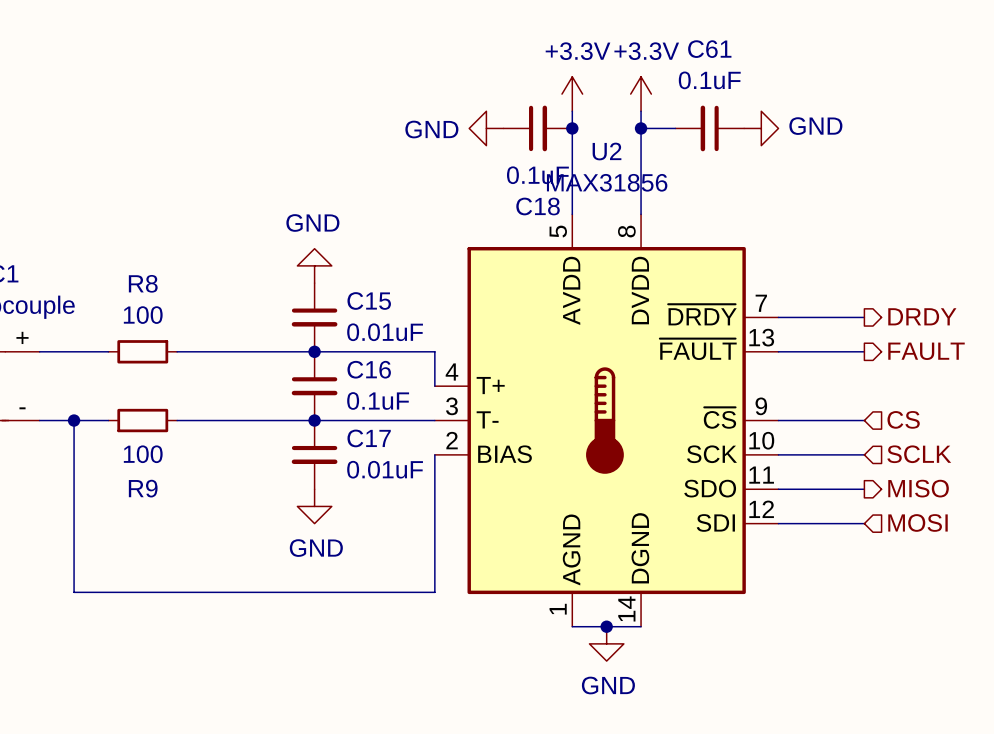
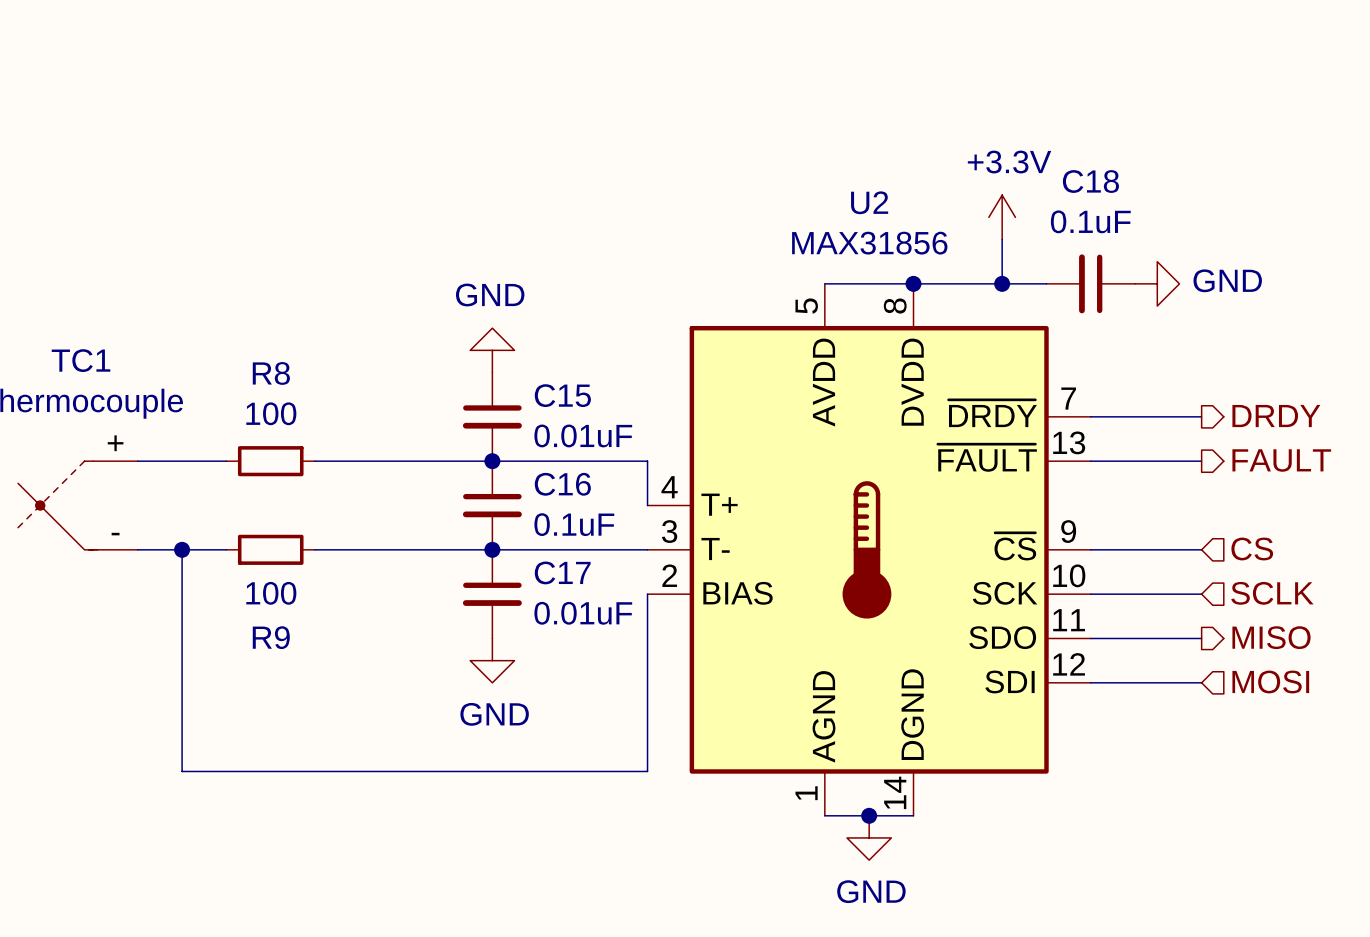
power symbol: +3.3V (572, 94) -> none
power symbol: +3.3V (641, 94) -> none
wire: (572, 111) (572, 214) -> (1046, 283) (824, 283)
wire: (641, 111) (641, 214) -> none
power symbol: GND (486, 128) -> none
C18 position: (537, 128) -> (1090, 283)
C18 rotation: 0° (538, 128) -> 180° (1090, 283)
junction: (572, 128) -> none
wire: (641, 128) (675, 128) -> none
junction: (641, 128) -> none
C61: 0.1uF (709, 128) -> none
power symbol position: GND (761, 128) -> GND (1157, 283)
power symbol: none -> +3.3V (1002, 217)
wire: none -> (1002, 239) (1002, 283)
junction: none -> (913, 283)
junction: none -> (1002, 283)

